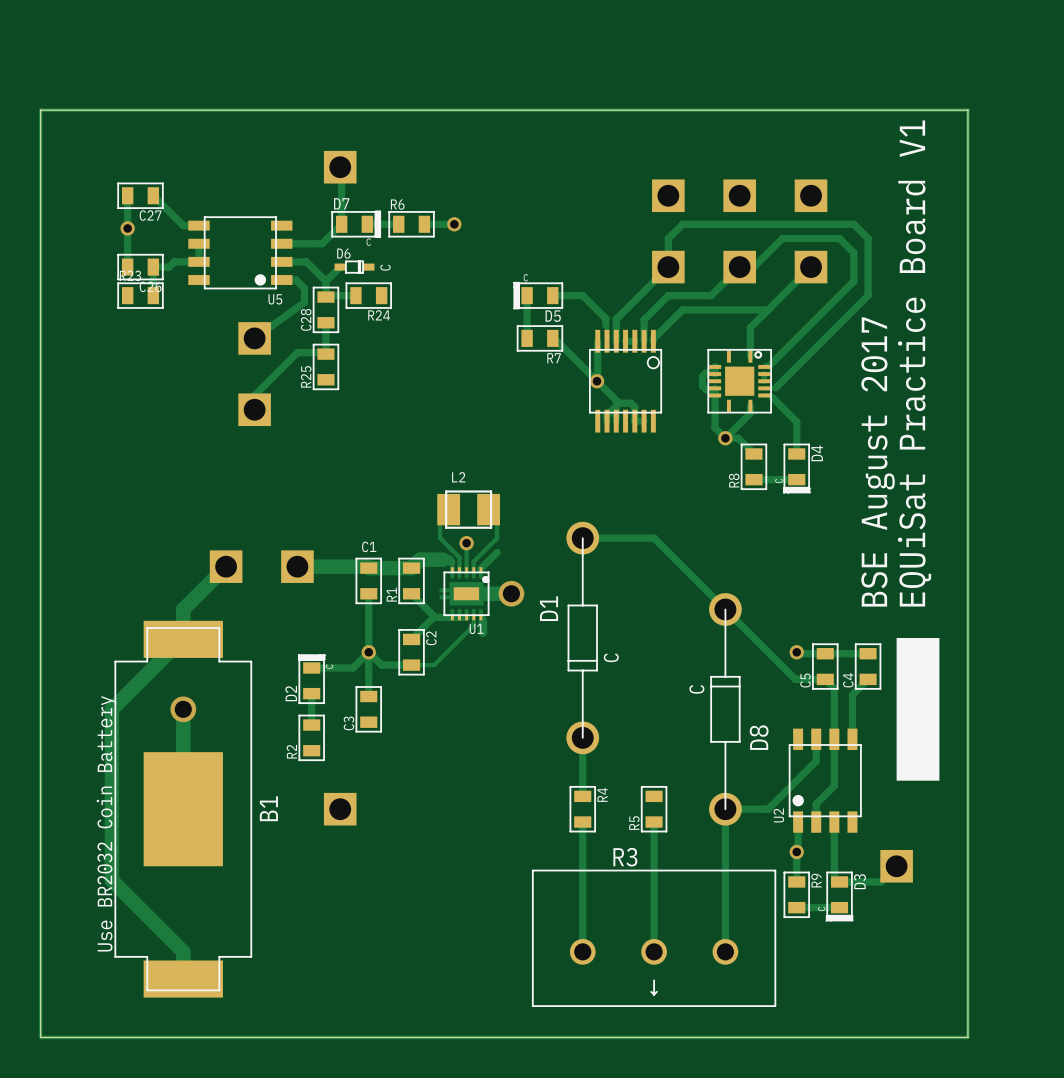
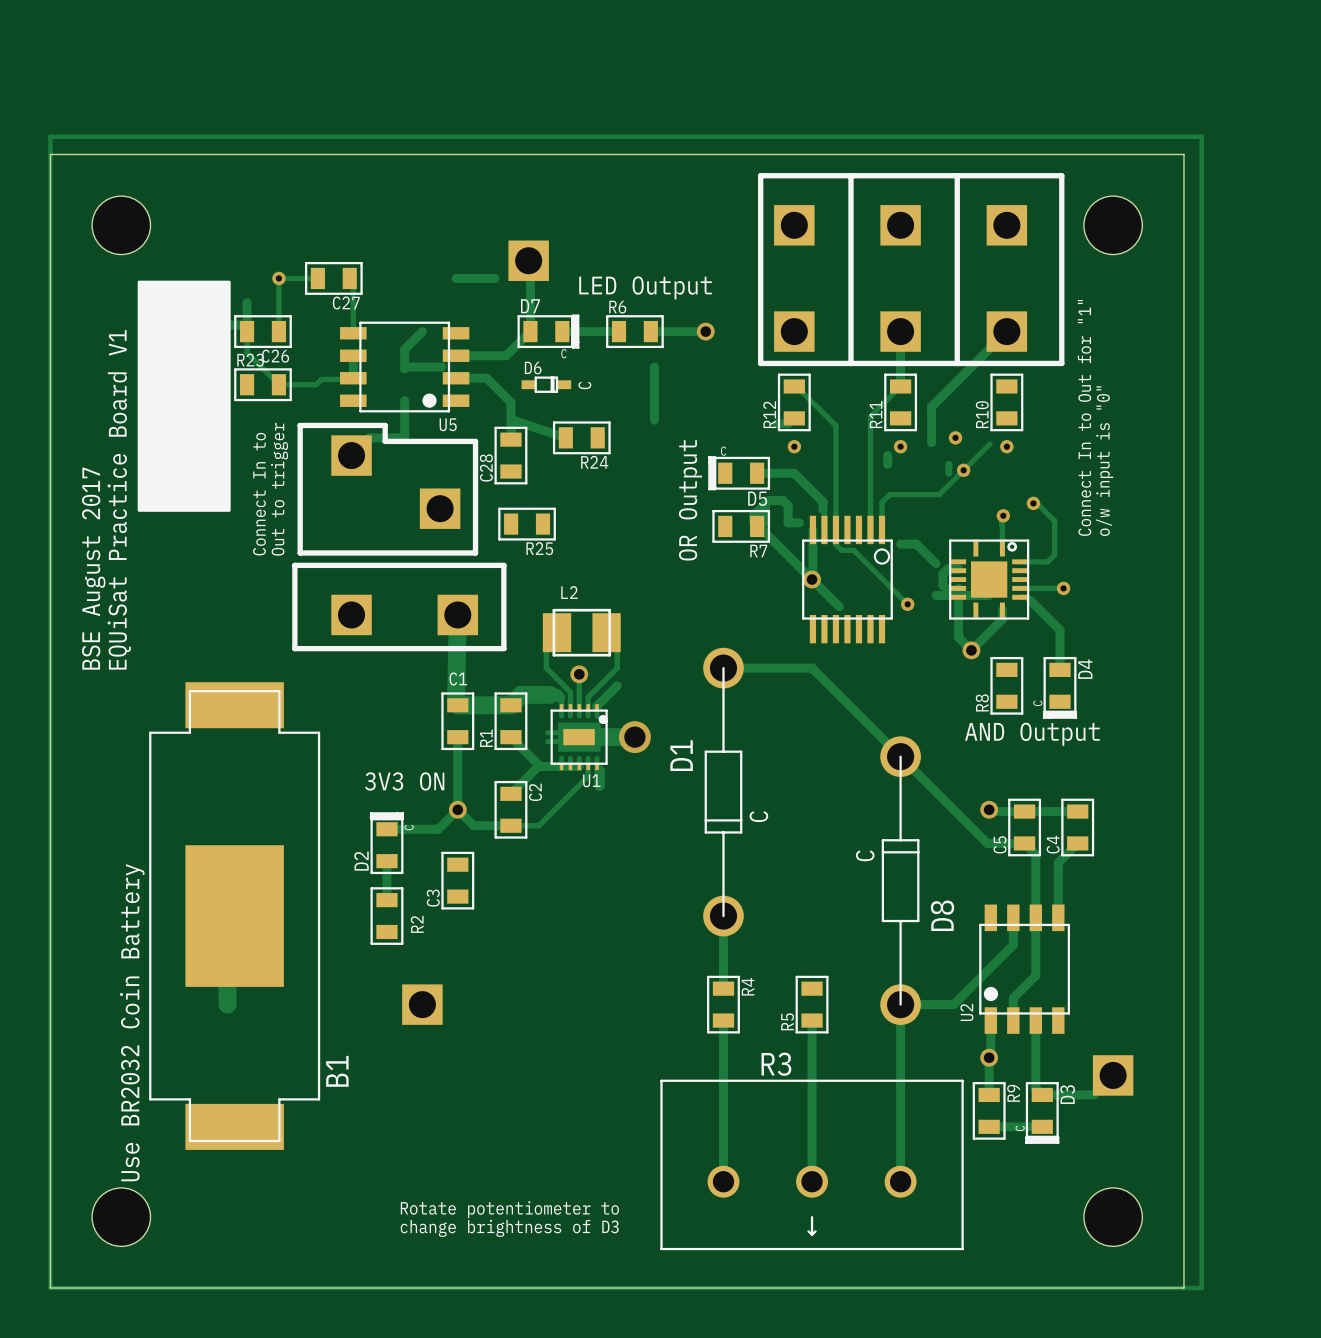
board edge: (40, 124) (40, 110) (967, 110) (967, 1037) (953, 1037) -> (50, 154) (1183, 154) (1183, 1288)
line: none -> (852, 175) (1061, 175) (1061, 363) (760, 363) (760, 175) (851, 175) (851, 363)
line: none -> (957, 175) (957, 363)
track: (340, 167) (341, 224) (322, 243) (281, 243) -> (528, 260) (530, 262) (530, 331) (506, 355) (456, 355)
part position: (340, 167) -> (528, 260)
hole: none -> (121, 225)
part: none -> (794, 225)
hole: none -> (1113, 225)
track: (127, 195) (127, 267) -> none
C27 position: (140, 195) -> (333, 278)
track: (153, 195) (183, 225) (198, 225) -> none
part: (668, 195) -> none
part position: (739, 195) -> (900, 225)
part position: (811, 195) -> (1006, 225)
via: none -> (278, 278)
track: none -> (317, 278) (278, 278) (278, 331)
track: none -> (349, 278) (353, 281) (353, 333)
D7 position: (356, 224) -> (548, 331)
R6 position: (411, 224) -> (634, 331)
track: (424, 224) (454, 224) -> none
via: (454, 224) -> none
drawing: none -> [137, 280, 231, 512]
via: (127, 228) -> none
text: none -> LED Output (645, 287)
U5 position: (240, 252) -> (404, 367)
track: (281, 261) (306, 261) (325, 281) -> none
C26 position: (140, 267) -> (262, 331)
track: none -> (247, 331) (247, 352) (278, 384) (316, 384) (321, 379) (352, 379) (353, 355)
D6 position: (354, 267) -> (546, 384)
track: none -> (562, 331) (618, 331)
track: none -> (650, 331) (705, 331)
via: none -> (705, 331)
part position: (668, 267) -> (794, 331)
track: none -> (900, 331) (900, 386) (870, 416) (870, 529)
part position: (739, 267) -> (900, 331)
track: (281, 280) (296, 280) (304, 288) (304, 302) (254, 338) -> none
R23 position: (140, 295) -> (262, 384)
R24 position: (368, 295) -> (581, 437)
D5 position: (538, 295) -> (739, 473)
track: (552, 295) (582, 295) (605, 318) (607, 341) -> (757, 473) (794, 473) (823, 501) (824, 529)
track: none -> (456, 378) (486, 378) (510, 402) (510, 439) (512, 420) (565, 437)
C28 position: (325, 309) -> (510, 455)
track: none -> (794, 384) (835, 425) (835, 544) (841, 550) (853, 550) (907, 604)
track: (768, 309) (682, 309) (653, 341) -> none
R12: none -> (794, 402)
R11: none -> (900, 402)
R10: none -> (1006, 402)
text: none -> Connect In to Out for "1" (1084, 417)
part: (254, 338) -> none
R7 position: (539, 338) -> (741, 526)
track: (552, 338) (619, 403) -> (757, 526) (839, 606)
track: (597, 341) (597, 381) -> (812, 529) (812, 579)
track: (616, 341) (616, 319) (668, 267) (668, 238) (682, 224) (853, 224) (868, 238) (868, 295) (775, 388) (764, 388) -> none
track: (644, 341) (644, 319) (668, 295) (711, 295) (739, 267) (753, 267) (782, 238) (839, 238) (853, 252) (853, 281) (769, 365) (764, 366) -> none
line: none -> (300, 425) (300, 552) (475, 552) (475, 441) (385, 441) (385, 425) (300, 425)
via: none -> (955, 437)
track: none -> (989, 443) (939, 494) (889, 494) (882, 502) (882, 529)
via: none -> (794, 446)
via: none -> (900, 446)
via: none -> (1006, 446)
text: EQUiSat Practice Board V1 (914, 363) -> none
track: (283, 366) (254, 395) (254, 409) -> none
part: none -> (351, 455)
R25 rotation: 0° (325, 366) -> 90° clockwise (527, 524)
R25 position: (325, 366) -> (527, 524)
text: none -> o/w input is "0" (1104, 461)
track: (715, 372) (706, 372) (702, 376) (702, 385) (706, 389) (715, 389) -> (958, 568) (947, 568) (942, 573) (942, 585) (947, 590) (958, 590)
R25 name position: R25 (306, 376) -> R25 (539, 548)
via: none -> (963, 470)
via: (597, 381) -> none
part position: (625, 381) -> (847, 579)
part position: (739, 381) -> (989, 579)
track: (715, 388) (715, 427) (725, 438) (750, 413) (750, 405) -> (958, 588) (958, 637) (971, 650) (1002, 619) (1002, 610)
text: none -> Out to trigger (279, 489)
text: none -> Connect In to (259, 494)
track: (772, 398) (796, 421) (796, 453) -> (1030, 600) (1060, 630) (1060, 669)
text: none -> EQUiSat Practice Board V1 (119, 499)
text: none -> OR Output (690, 500)
track: none -> (1033, 503) (1038, 505) (1054, 521) (1054, 554) (1047, 561) (1019, 561)
via: none -> (1033, 503)
part: (254, 409) -> none
part: none -> (440, 508)
track: none -> (1003, 515) (1001, 517) (1002, 548)
via: none -> (1003, 515)
via: (725, 438) -> none
line: none -> (294, 565) (294, 648) (503, 648) (503, 565) (294, 565)
text: none -> BSE August 2017 (93, 568)
text: BSE August 2017 (878, 461) -> none
via: none -> (812, 579)
R8 position: (753, 466) -> (1006, 685)
D4 position: (796, 468) -> (1060, 687)
track: none -> (1019, 588) (1063, 588)
via: none -> (1063, 588)
via: none -> (907, 604)
part: none -> (351, 614)
part: none -> (457, 614)
via: none -> (971, 650)
track: (226, 566) (183, 609) (183, 639) -> none
part: (226, 566) -> none
track: (297, 566) (367, 566) -> (457, 614) (456, 703)
part: (297, 566) -> none
text: none -> AND Output (1032, 734)
text: none -> 3V3 ON (404, 781)
track: (183, 638) (111, 709) (111, 880) (183, 951) (183, 979) -> none
drawing: [896, 638, 940, 781] -> none
track: (368, 652) (368, 696) -> none
via: (183, 709) -> none
R2 name position: R2 (291, 751) -> R2 (417, 924)
B1 name position: B1 (268, 808) -> B1 (337, 1071)
B1 position: (183, 809) -> (234, 916)
text: none -> Rotate potentiometer to (509, 1209)
hole: none -> (121, 1217)
hole: none -> (1113, 1217)
text: none -> change brightness of D3 (509, 1228)

